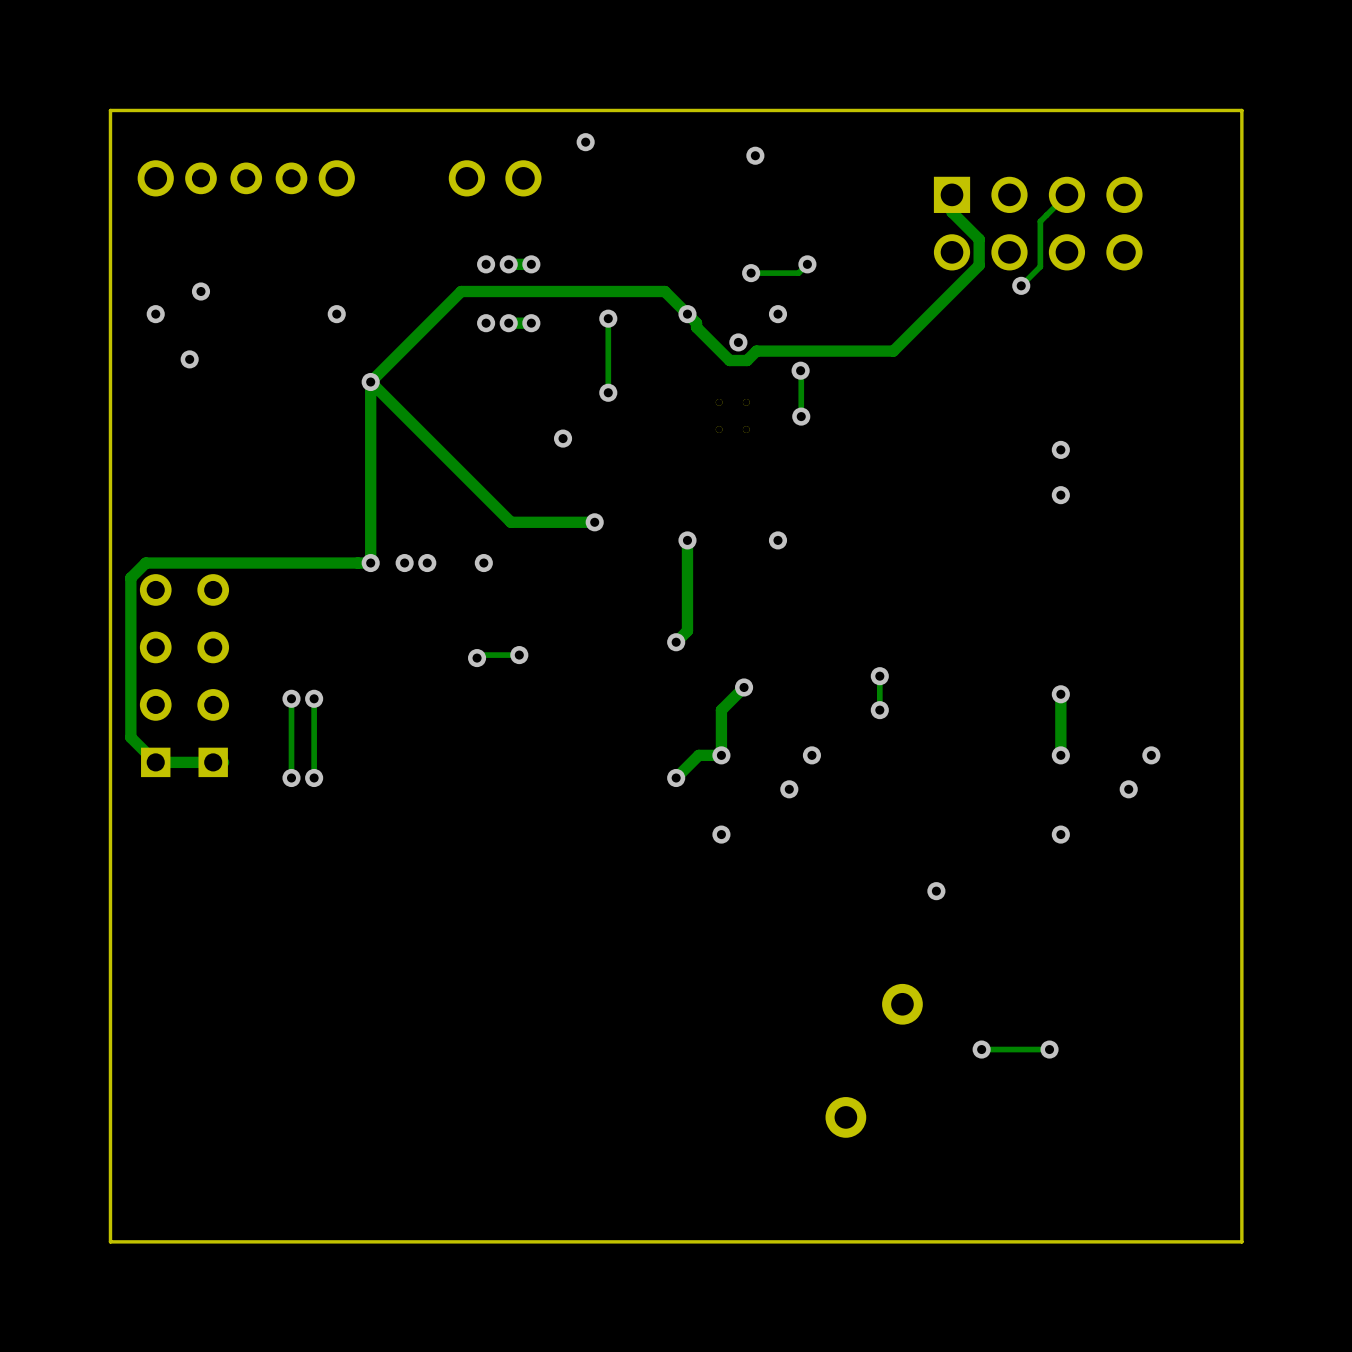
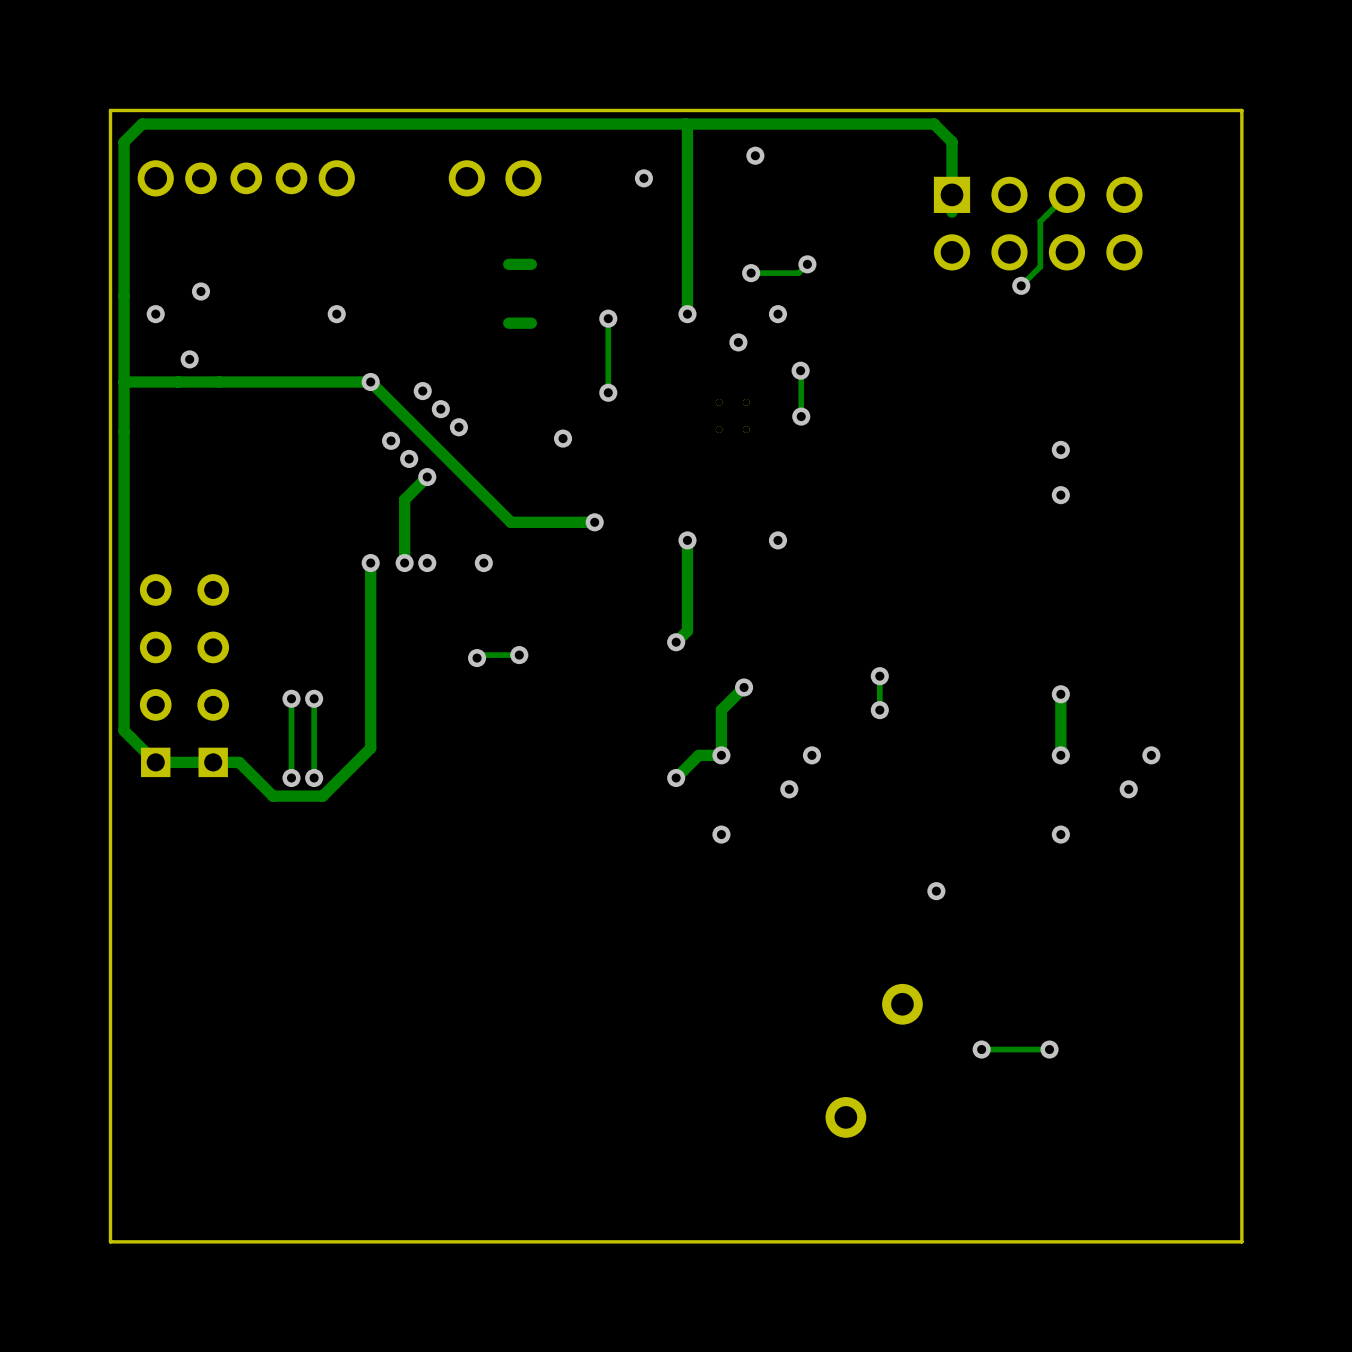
track: none -> (685, 124) (687, 126) (687, 314)
via position: (585, 142) -> (643, 178)
track: (952, 212) (979, 239) (979, 265) (893, 351) (756, 351) (747, 360) (729, 360) (664, 291) (461, 291) (370, 382) (370, 563) (145, 563) (130, 578) (130, 737) -> (952, 194) (952, 141) (934, 124) (142, 124) (124, 142) (124, 730) (130, 737)
via: (486, 264) -> none
via: (508, 264) -> none
via: (531, 264) -> none
via: (486, 323) -> none
via: (508, 323) -> none
via: (531, 323) -> none
track: none -> (370, 382) (124, 382)
via: none -> (422, 391)
via: none -> (440, 409)
via: none -> (458, 427)
via: none -> (391, 440)
via: none -> (409, 458)
track: none -> (427, 477) (404, 499) (404, 563)
via: none -> (427, 477)
track: none -> (370, 563) (370, 748) (322, 796) (272, 796) (239, 762) (223, 762)

